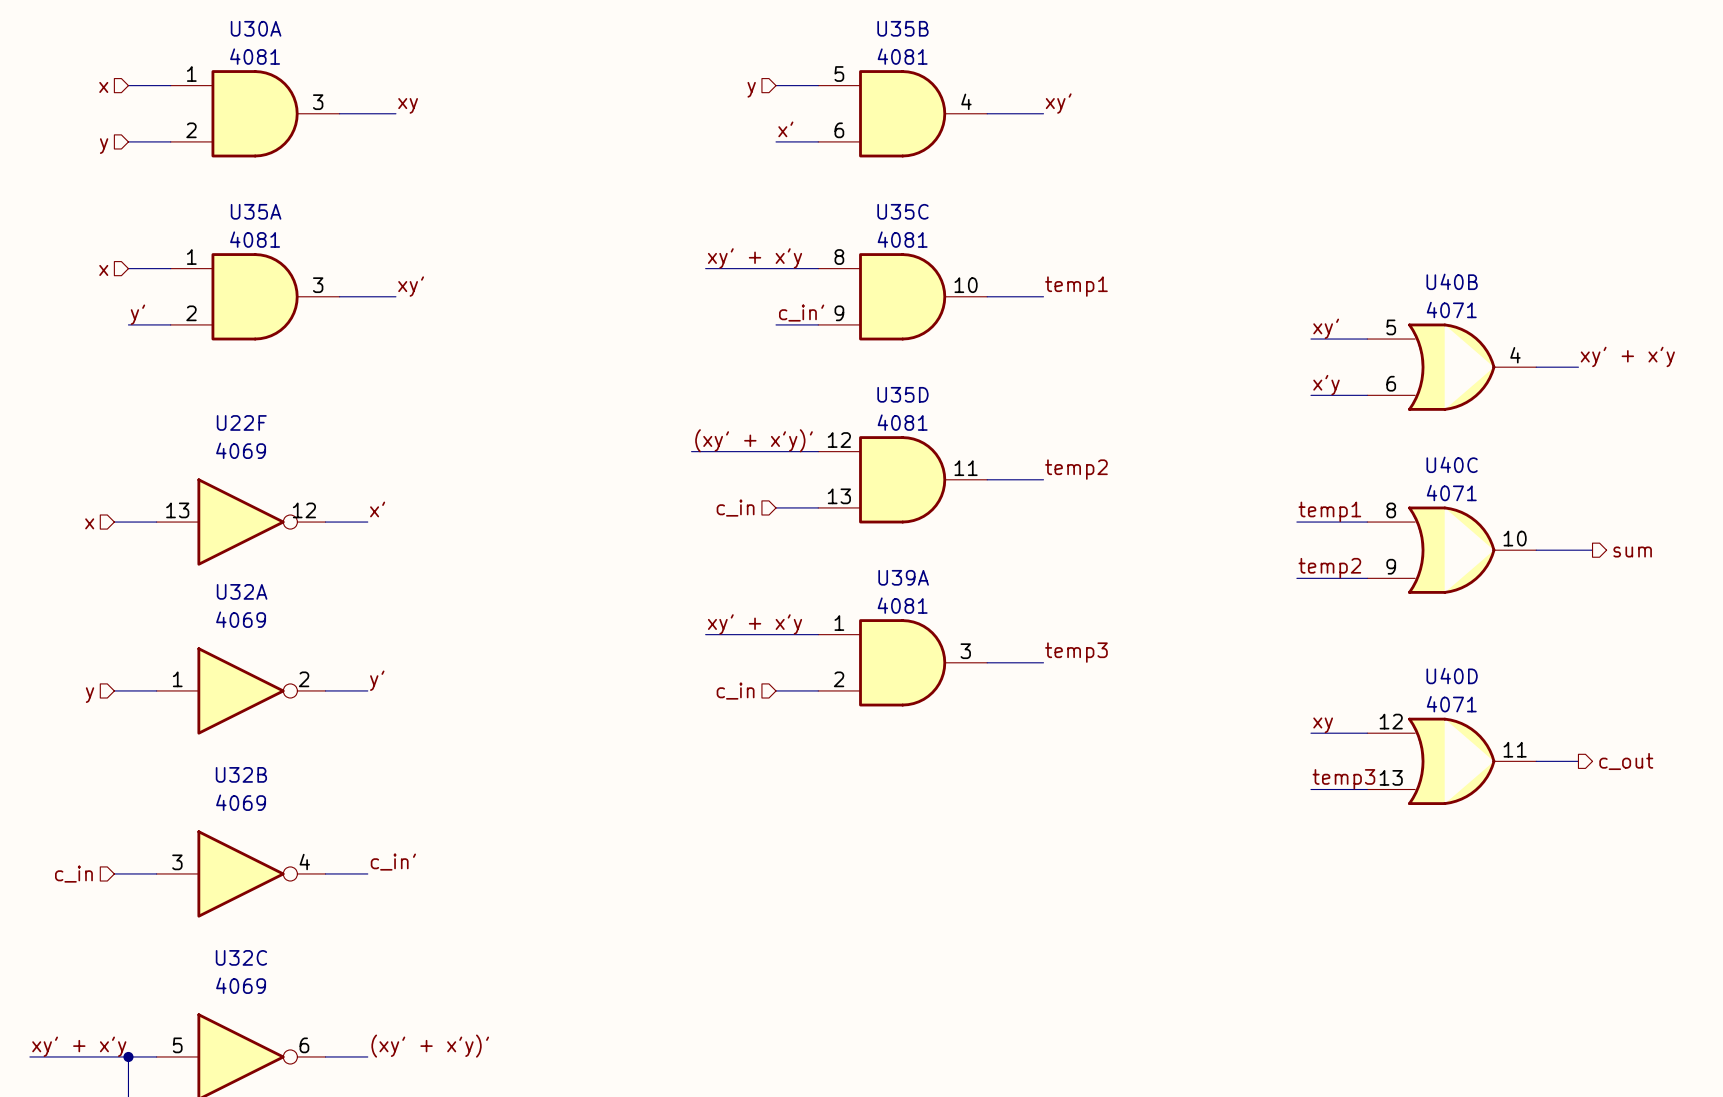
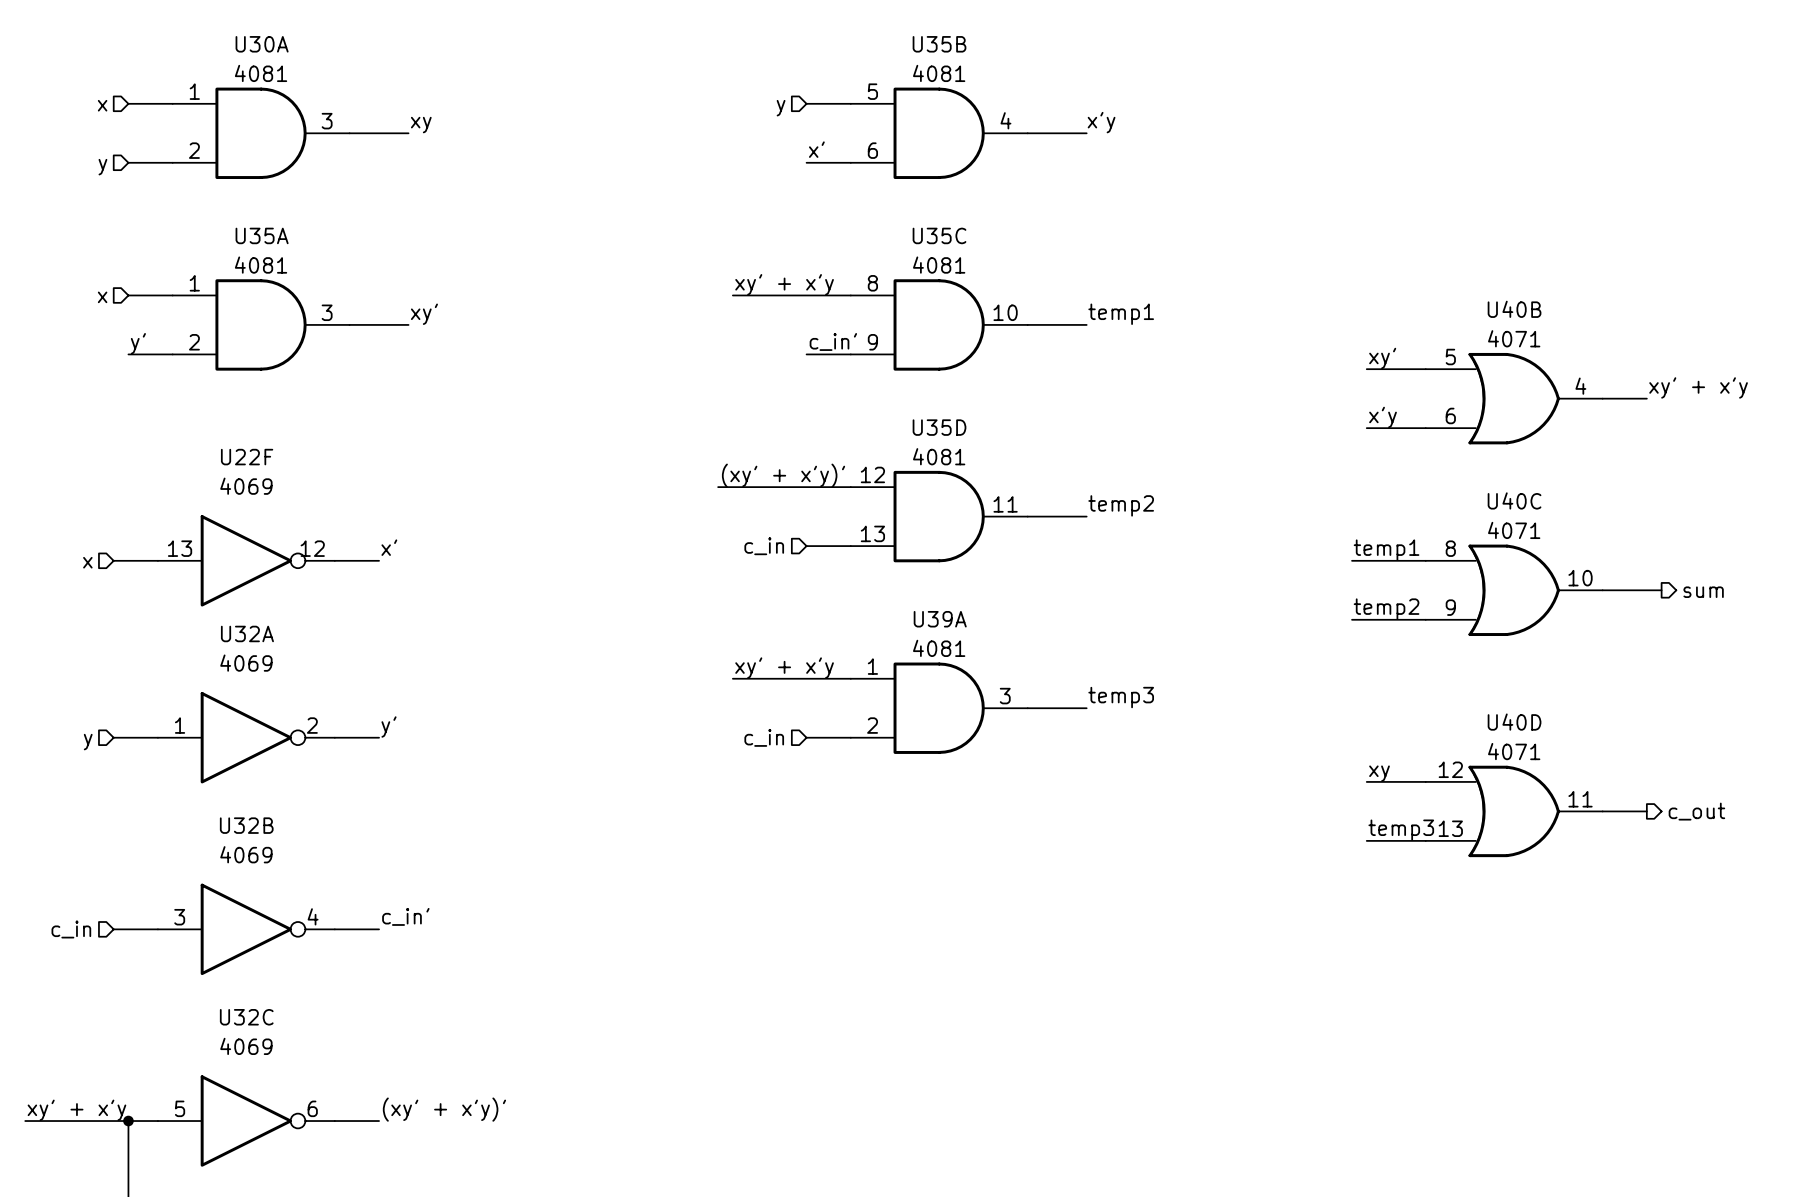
label: xy' (1058, 103) -> x'y (1101, 122)

